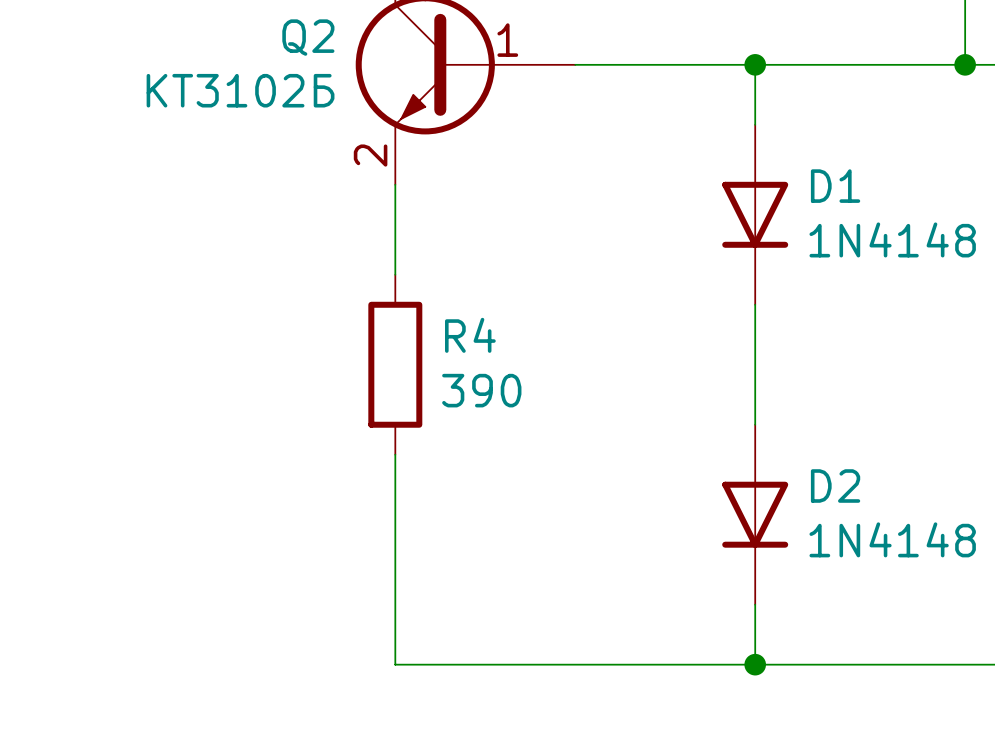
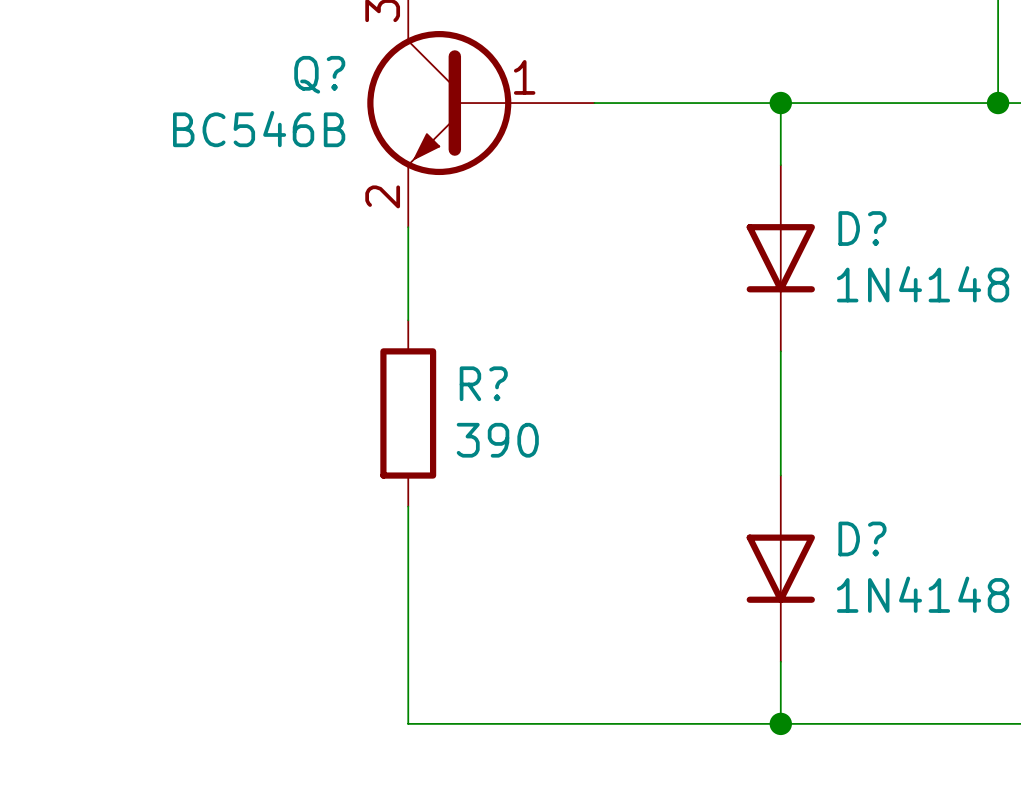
Q2 name: Q2 (308, 37) -> Q? (319, 74)
Q2 value: КТ3102Б (240, 90) -> BC546B (259, 129)
D1 name: D1 (835, 186) -> D? (862, 228)
R4 name: R4 (470, 335) -> R? (483, 383)
D2 name: D2 (835, 486) -> D? (862, 538)

